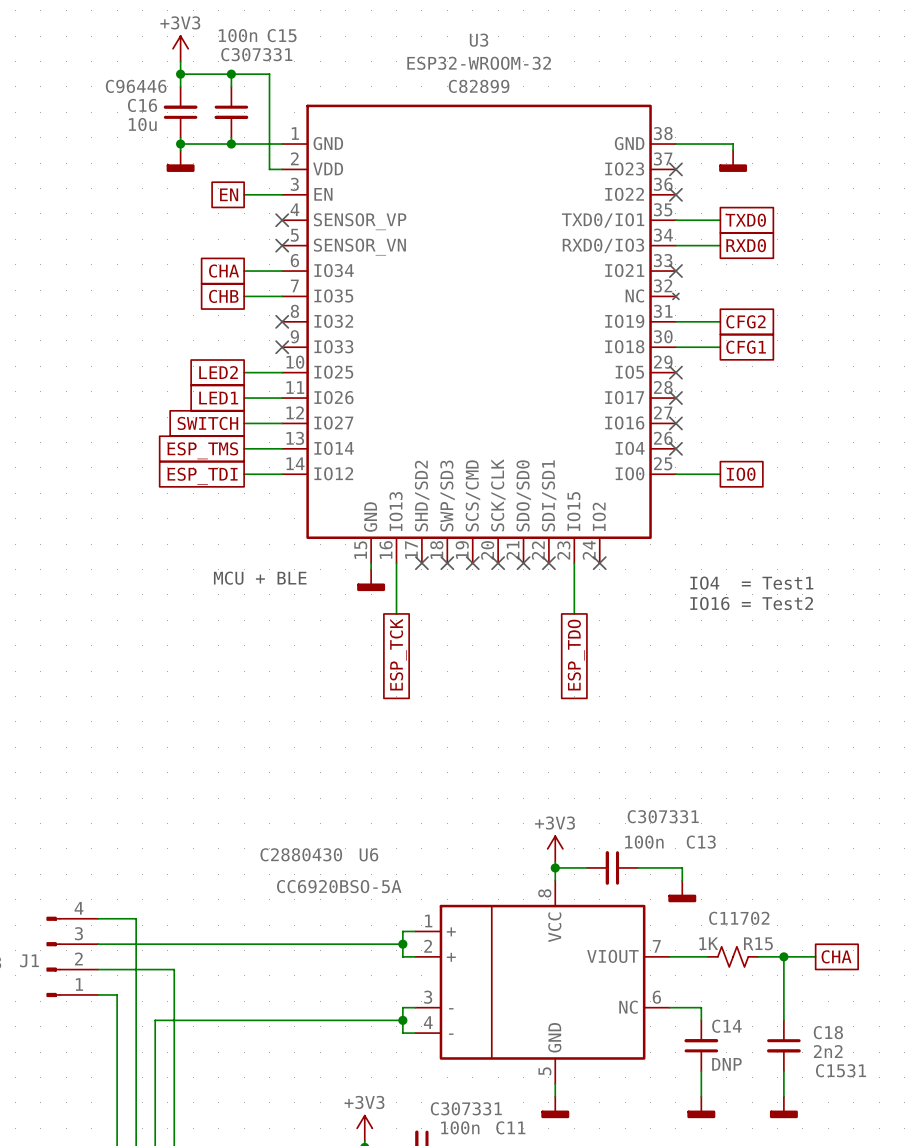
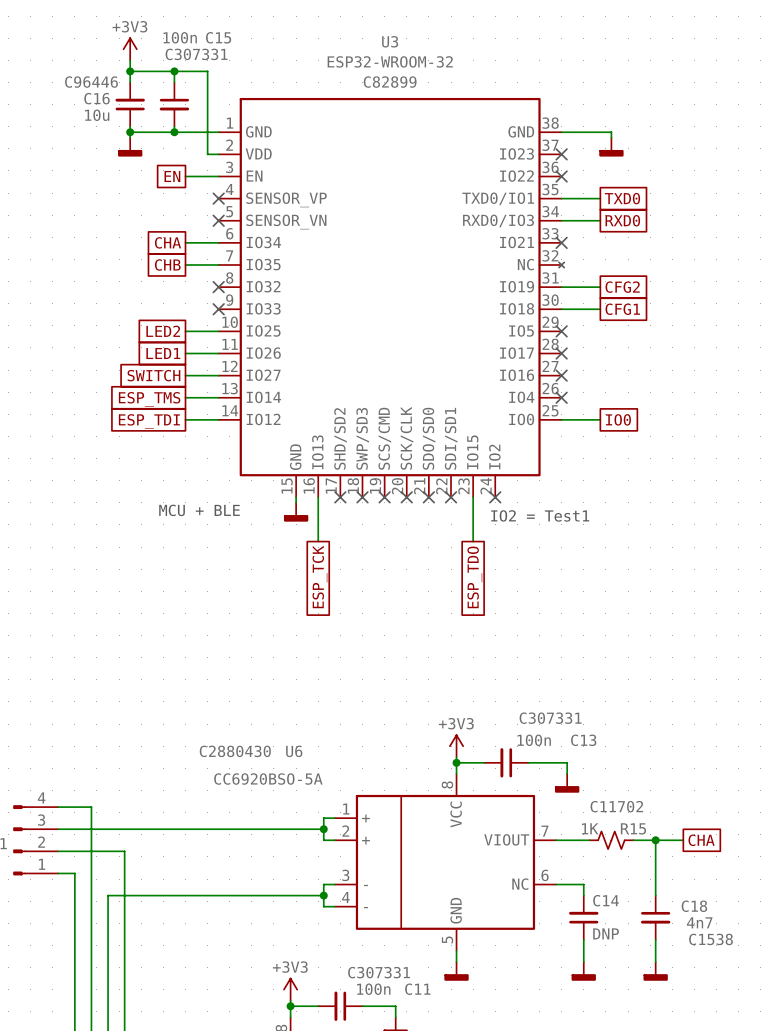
text: IO4 = Test1 (751, 583) -> none
text: none -> IO2 = Test1 (540, 515)
text: IO16 = Test2 (751, 603) -> none
C18 value: 2n2 (828, 1051) -> 4n7 (699, 922)
C18 text: C1531 (841, 1070) -> C1538 (711, 939)

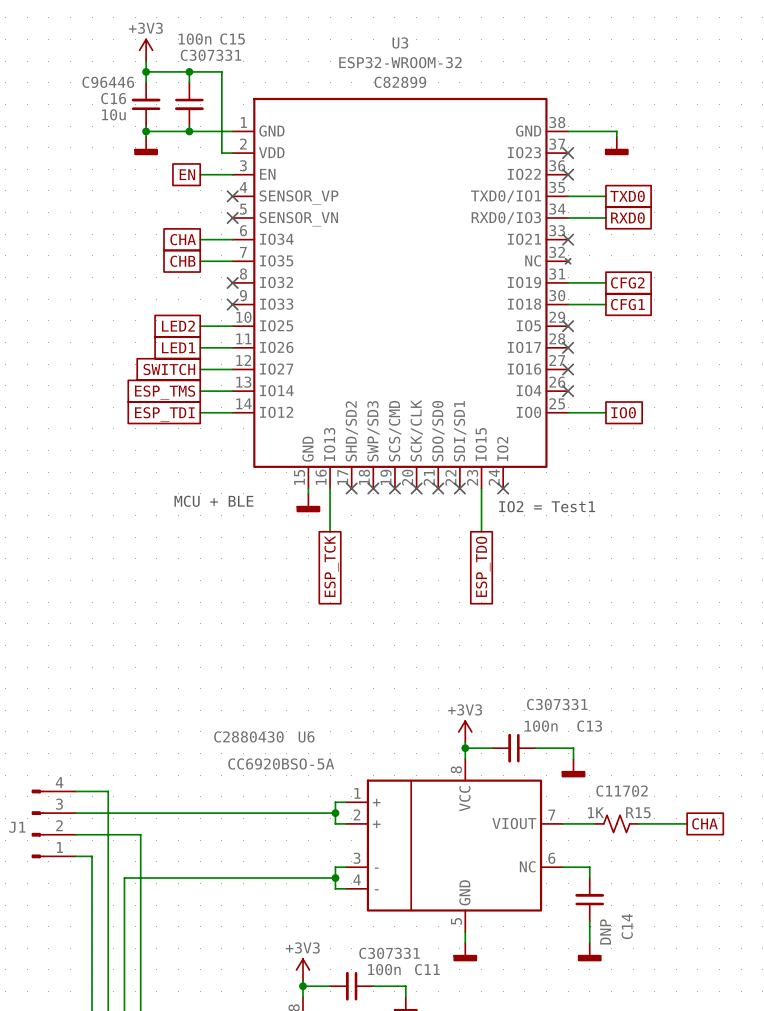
wire: (655, 840) (655, 895) -> none
junction: (655, 840) -> none
C14 name rotation: 0° (606, 900) -> 90° counterclockwise (627, 926)
C14 name position: C14 (606, 900) -> C14 (627, 926)
C18: 4n7 (655, 917) -> none
C14 value rotation: 0° (606, 933) -> 90° counterclockwise (605, 931)
wire: (655, 939) (655, 961) -> none
power symbol: (655, 971) -> none

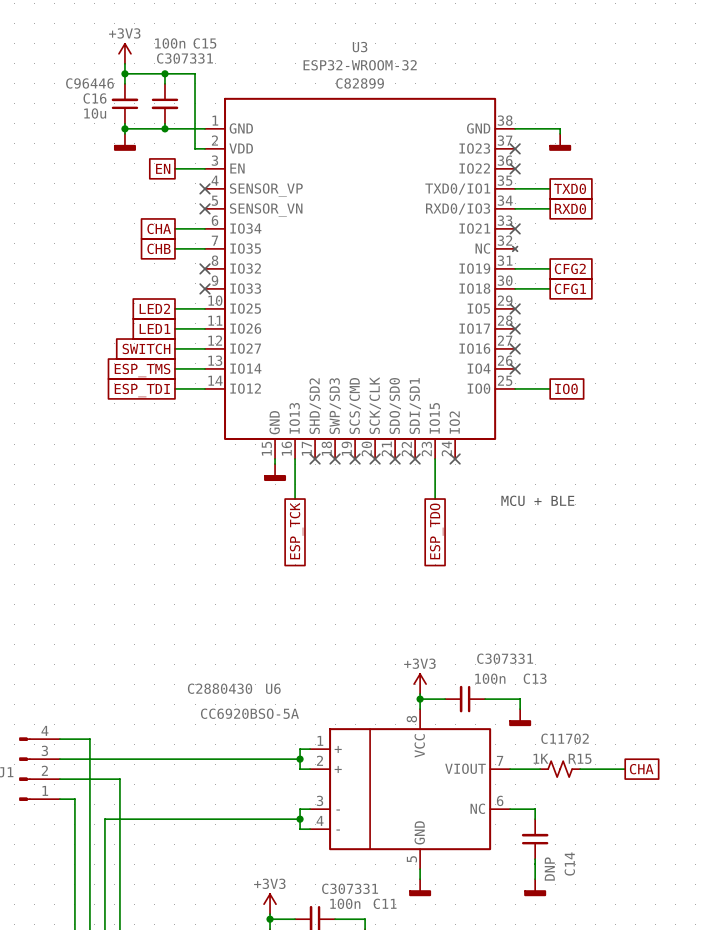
text: MCU + BLE (213, 501) -> none
text: IO2 = Test1 (547, 506) -> none
text: none -> MCU + BLE (537, 500)

